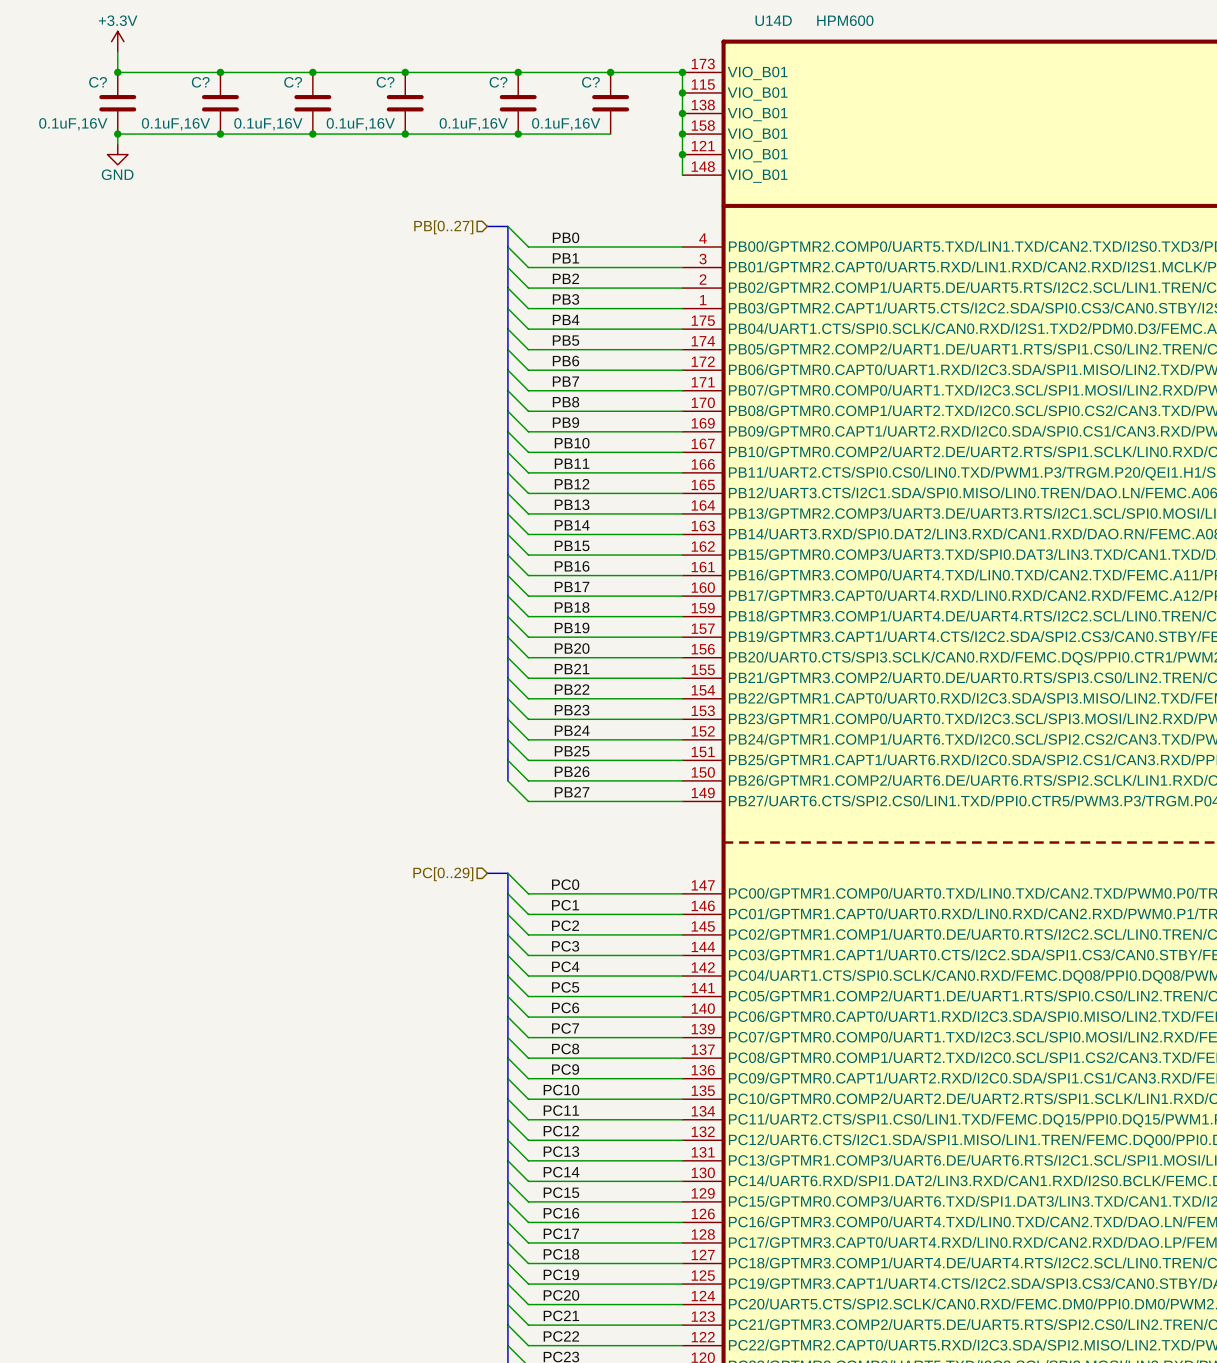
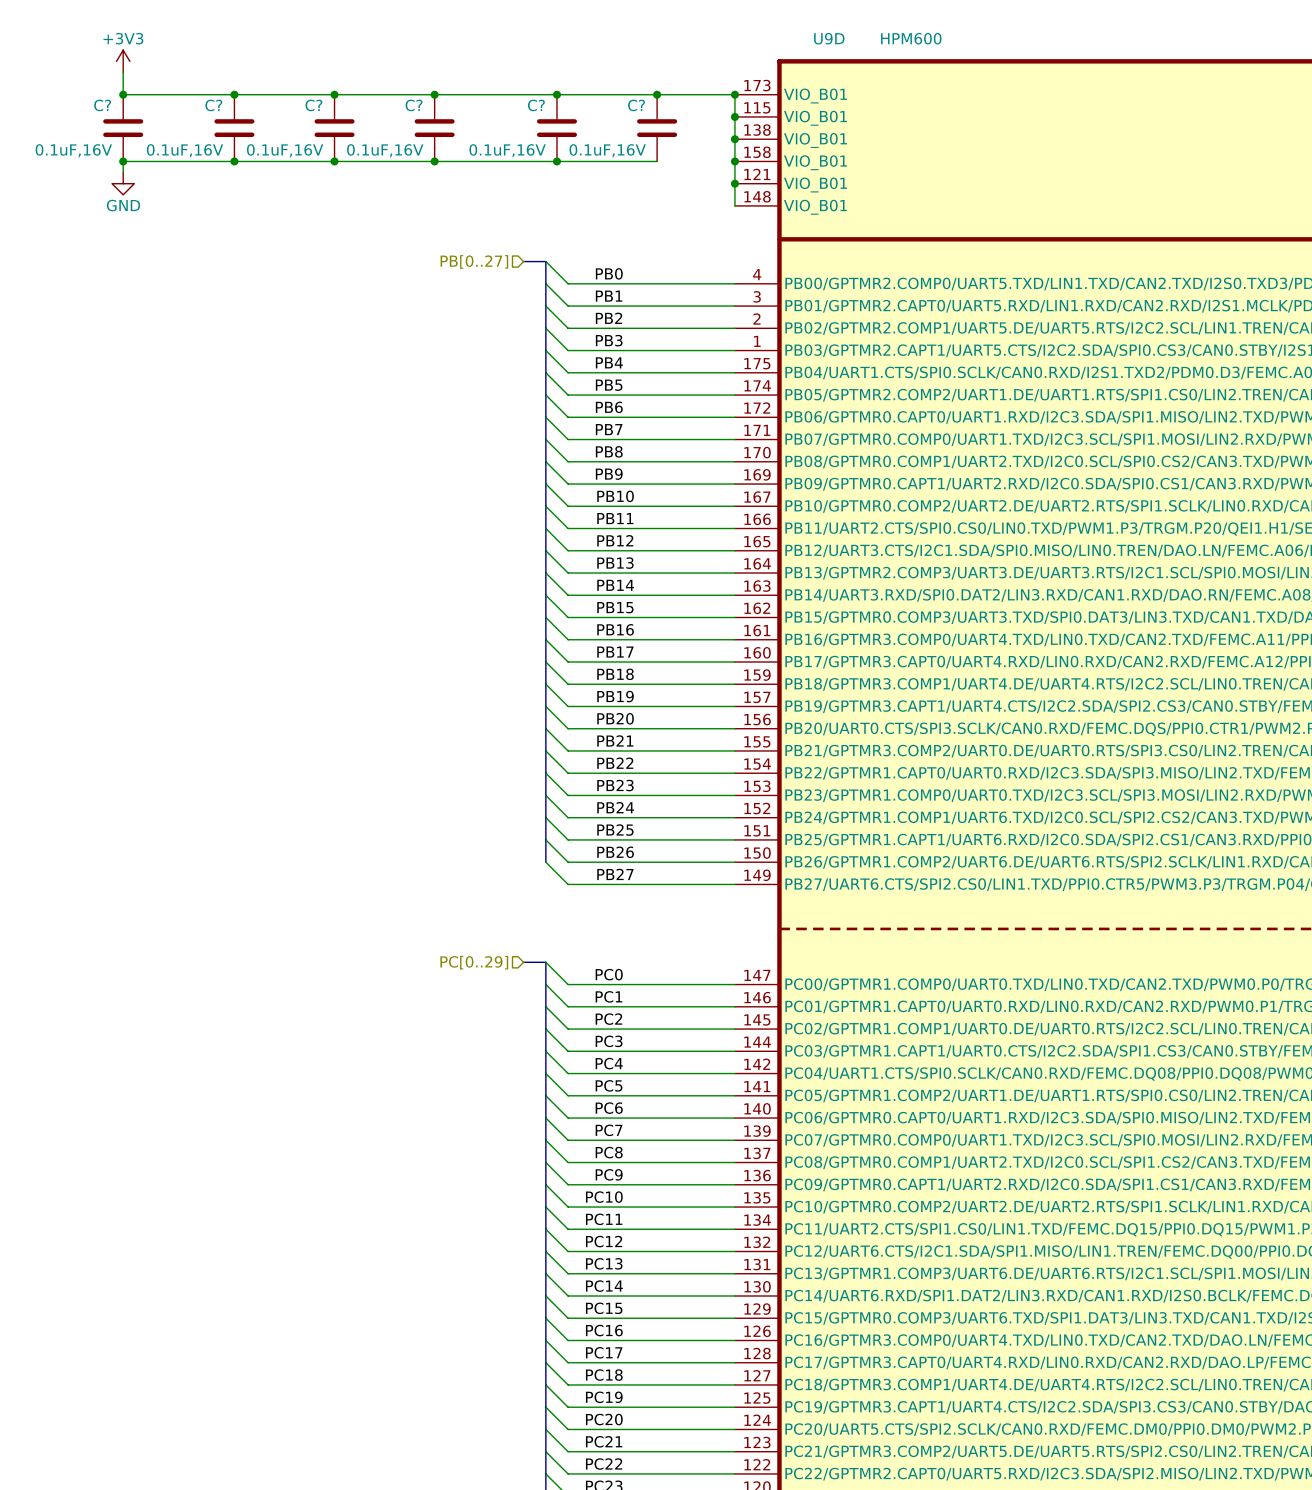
U14D name: U14D (773, 20) -> U9D (829, 38)
power symbol: +3.3V (117, 41) -> +3V3 (123, 61)

